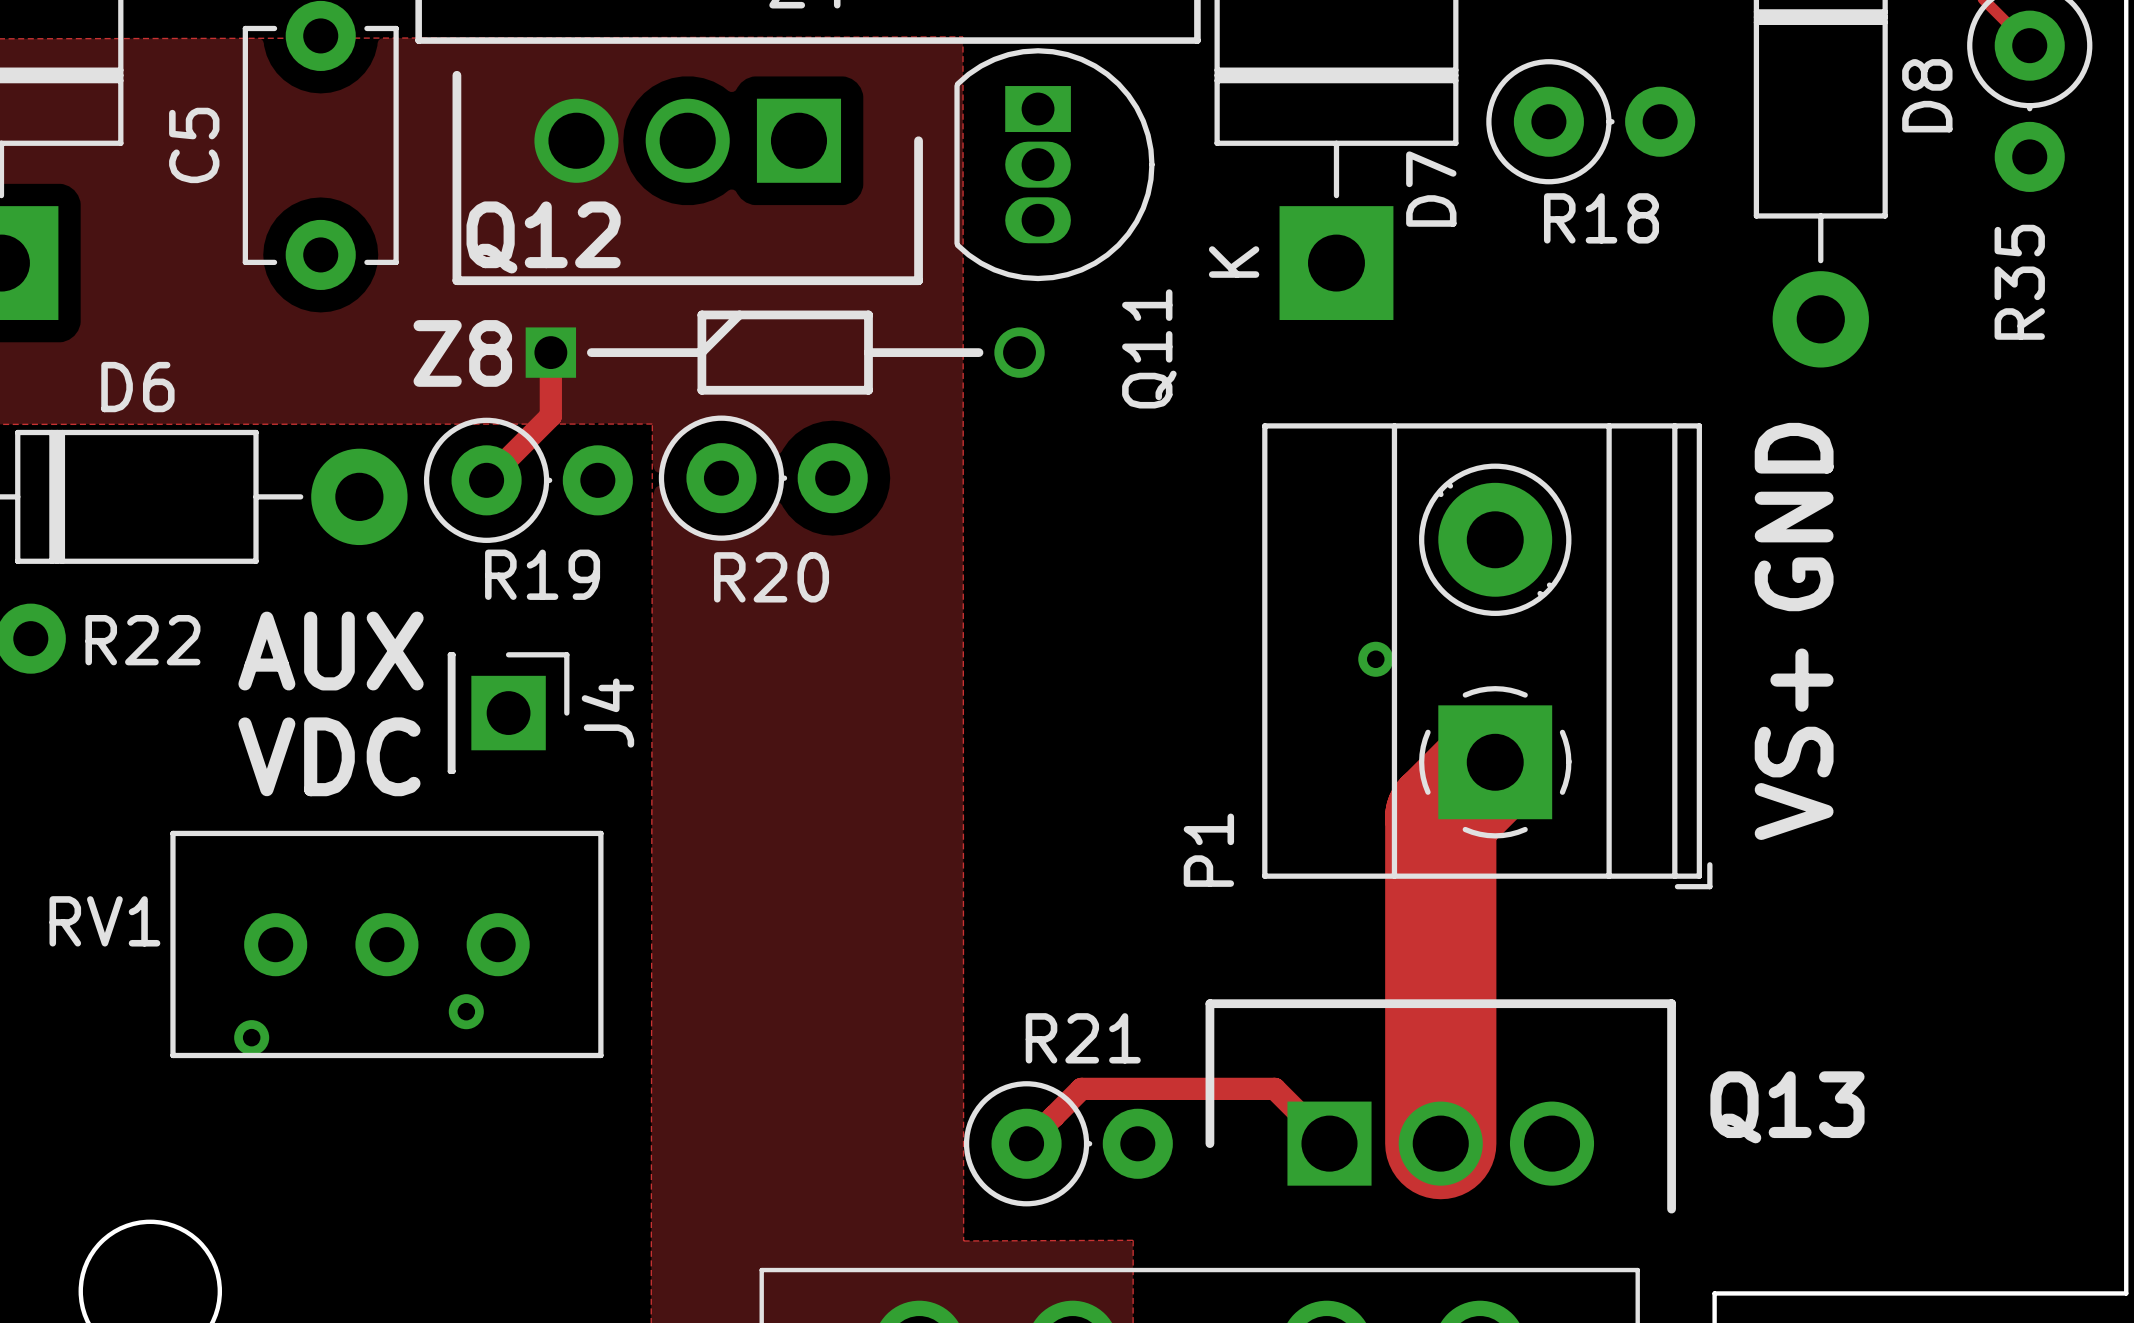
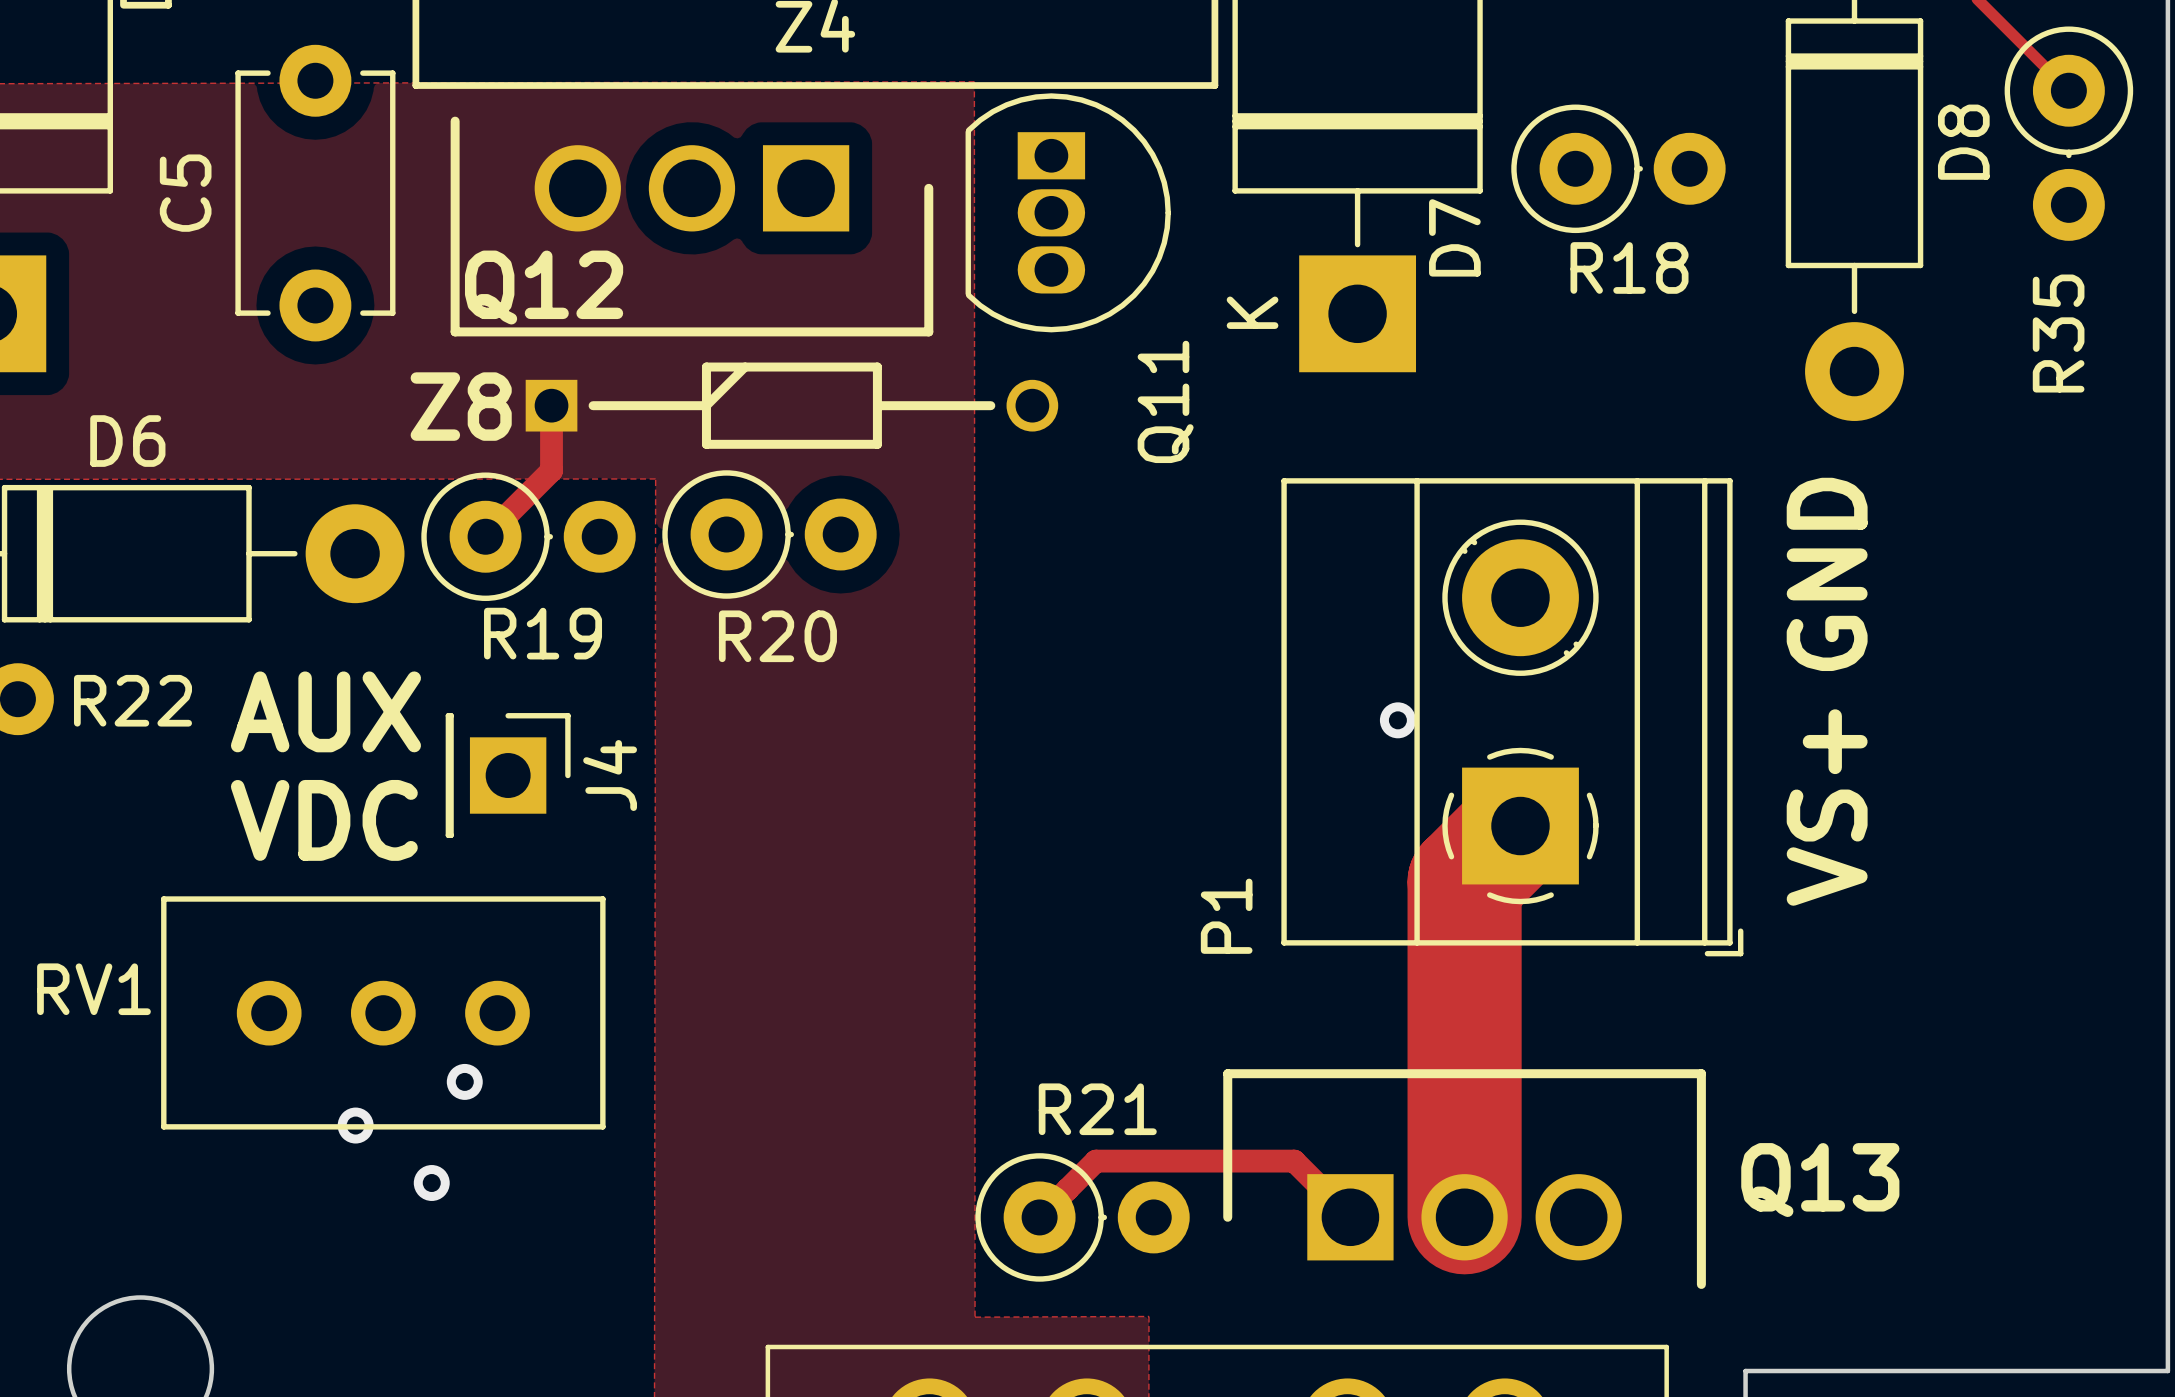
via: (251, 1037) -> none
via: none -> (355, 1125)
via: none -> (431, 1183)

